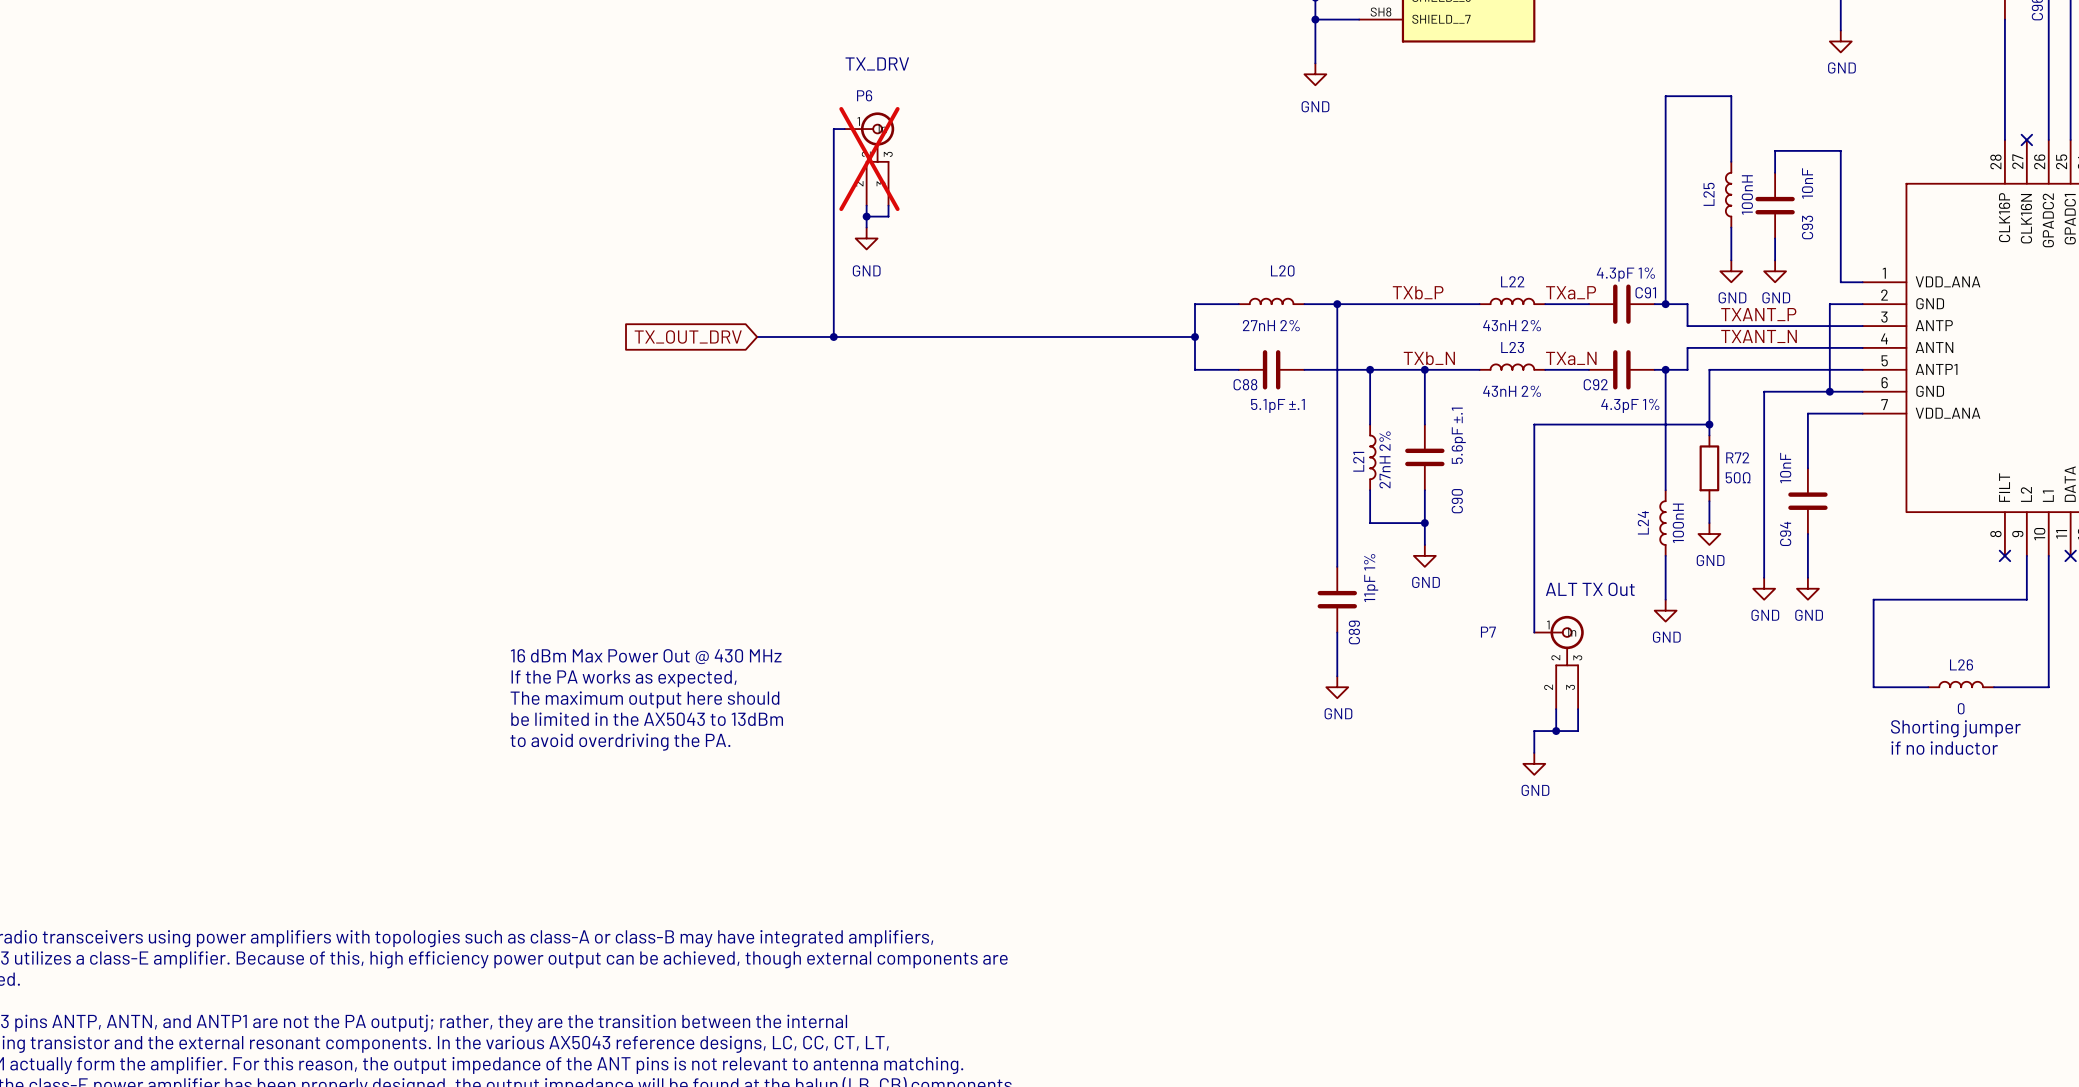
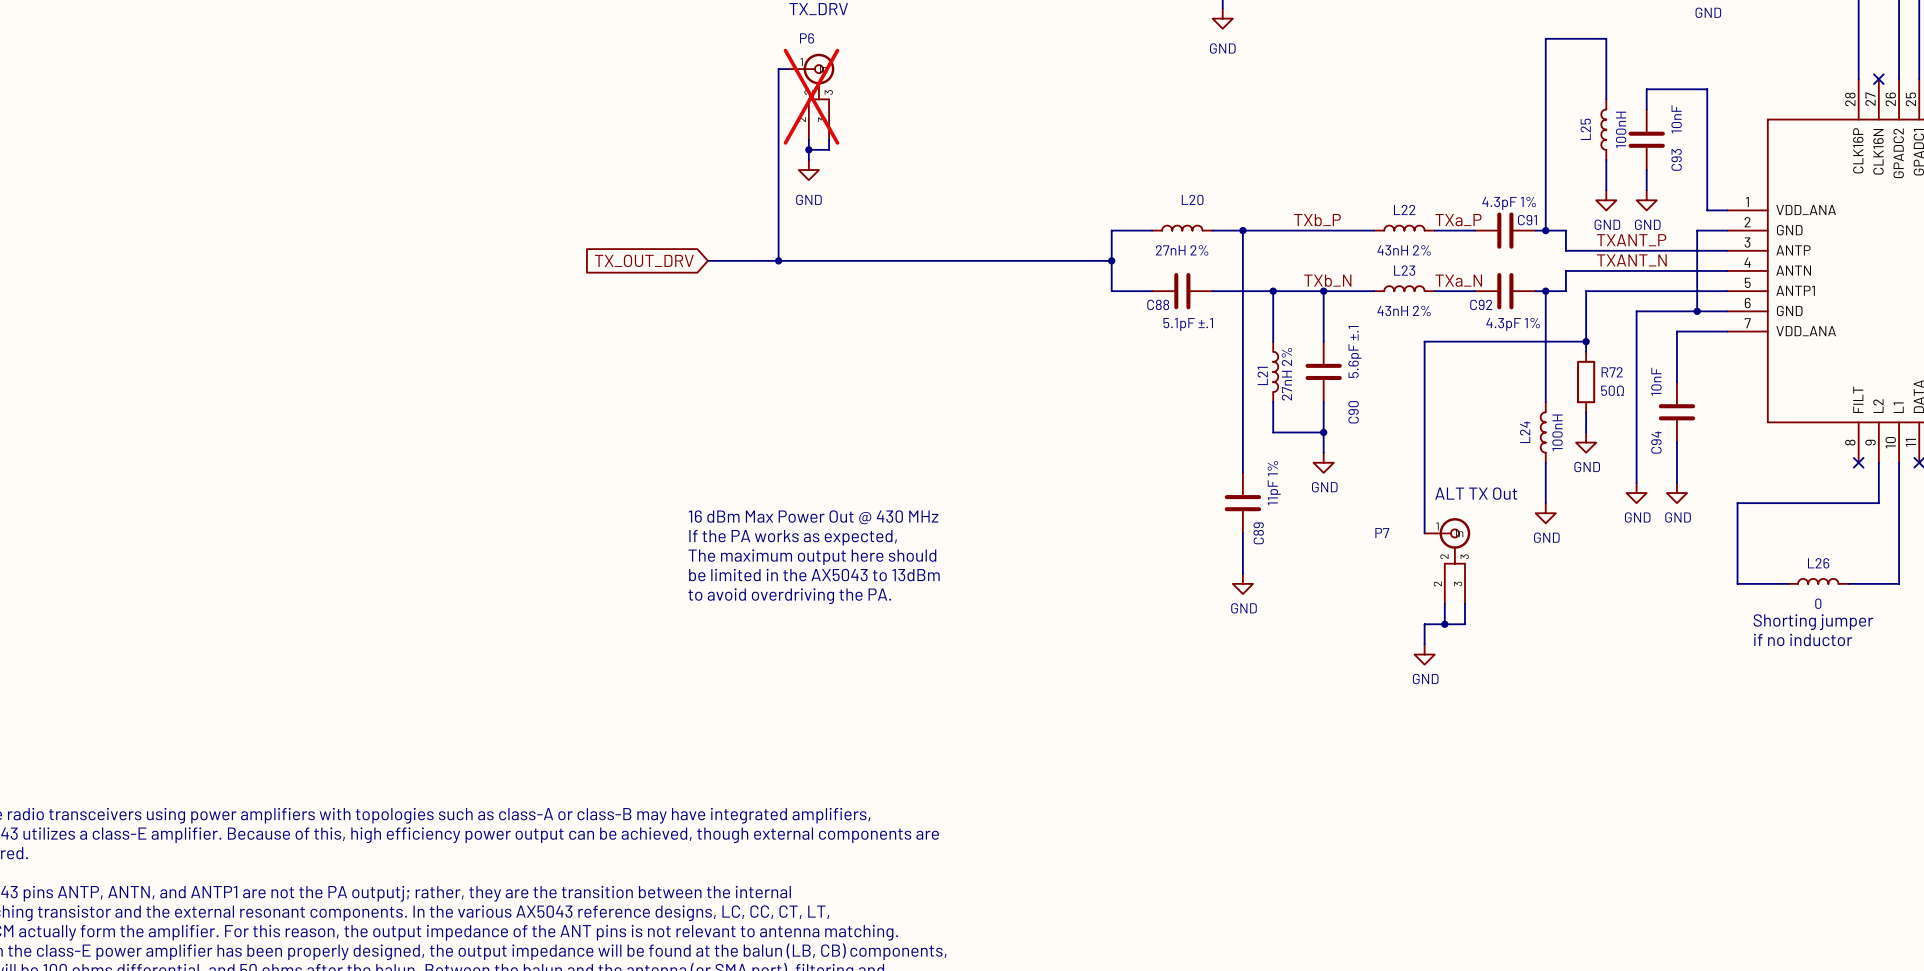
text: none -> 16 dBm Max Power Out @ 430 MHz (813, 517)
text: none -> If the PA works as expected, (793, 537)
text: 16 dBm Max Power Out @ 430 MHz (646, 656) -> none
text: none -> The maximum output here should (812, 557)
text: none -> be limited in the AX5043 to 13dBm (814, 575)
text: If the PA works as expected, (624, 678) -> none
text: The maximum output here should (644, 699) -> none
text: none -> to avoid overdriving the PA. (789, 596)
text: be limited in the AX5043 to 13dBm (647, 719) -> none
text: to avoid overdriving the PA. (620, 742) -> none

